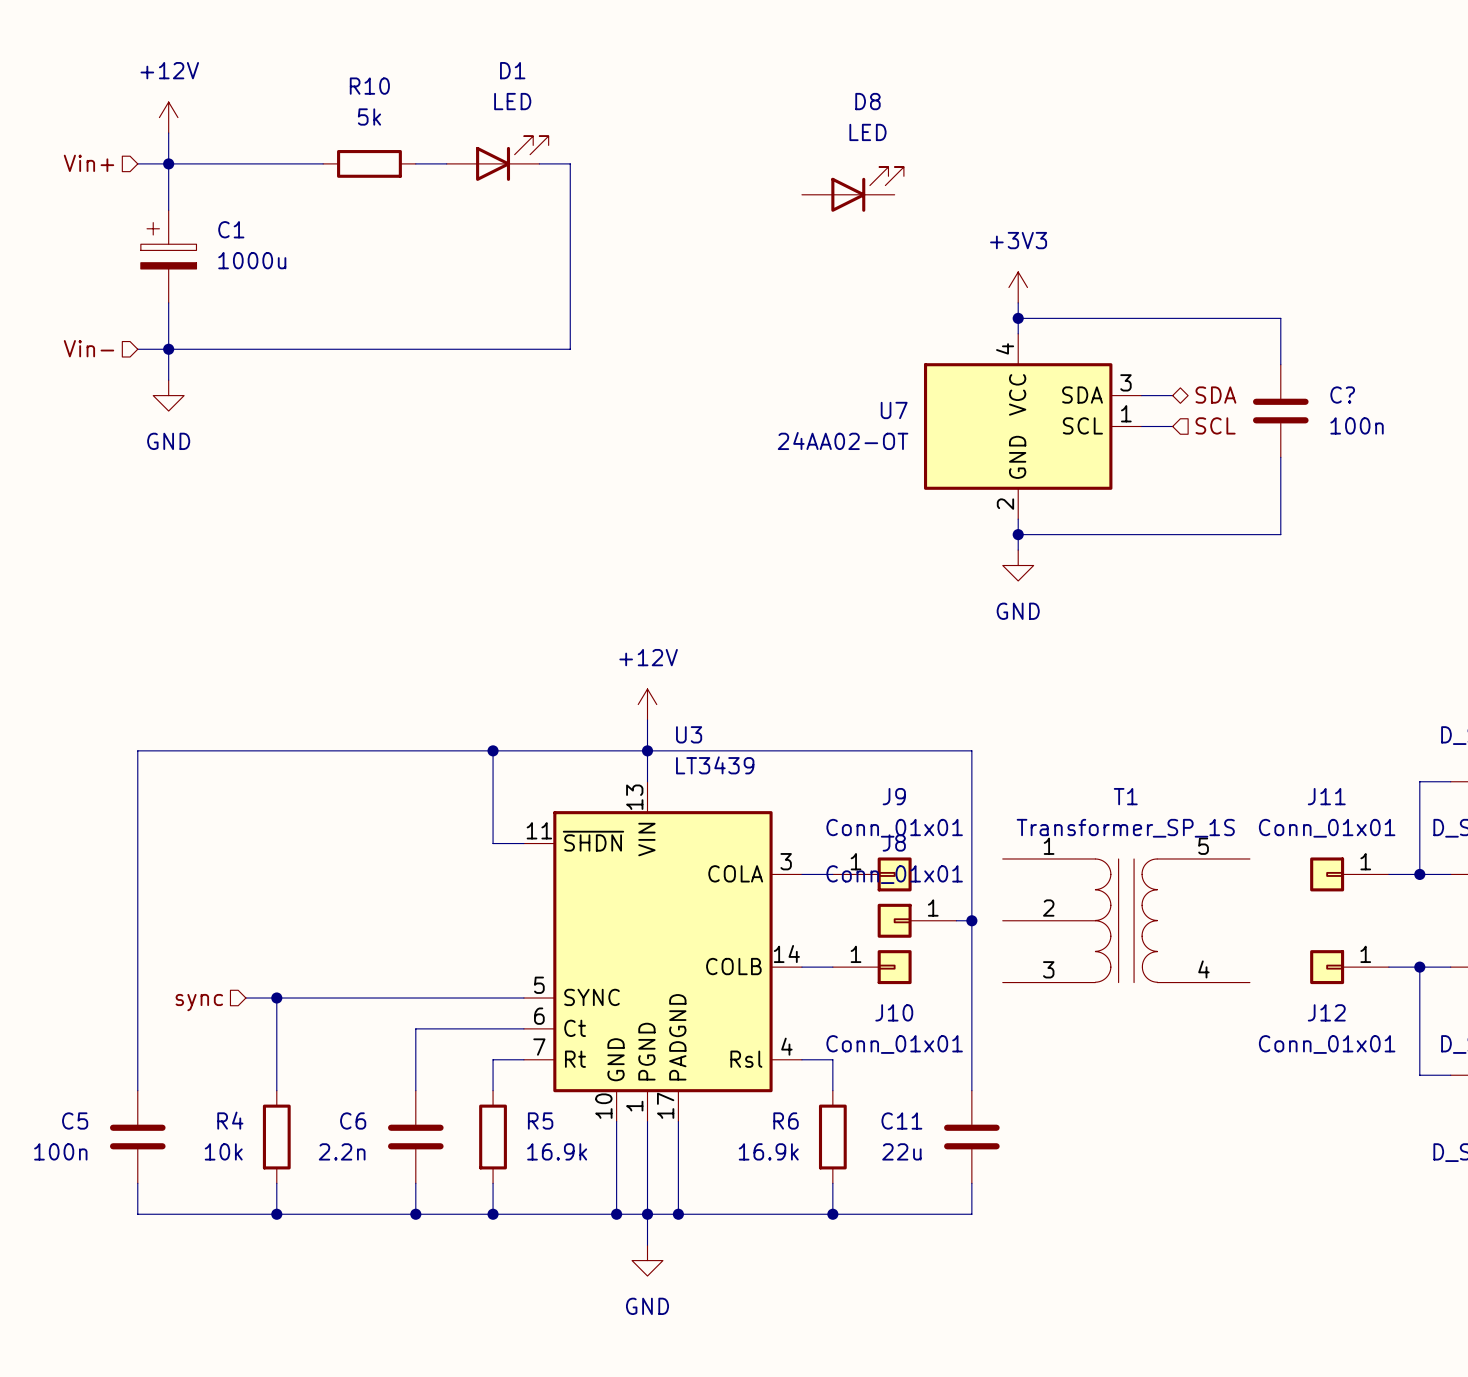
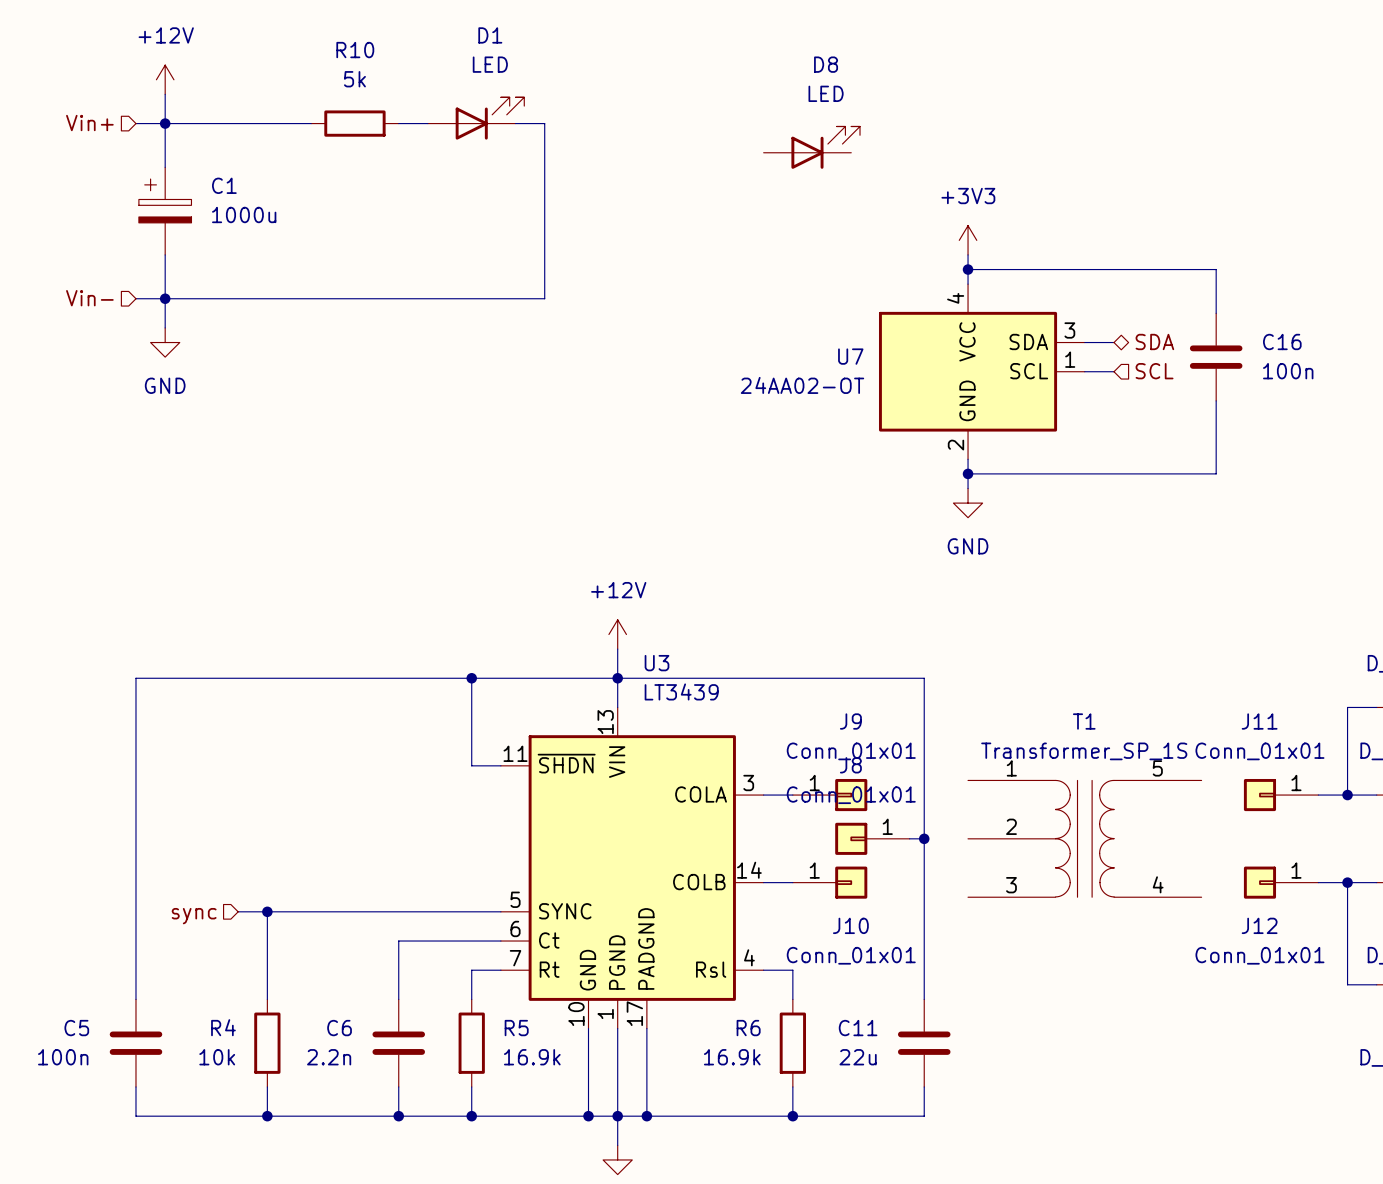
C? name: C? (1342, 395) -> C16 (1282, 341)
T1 position: (1126, 920) -> (1084, 838)

